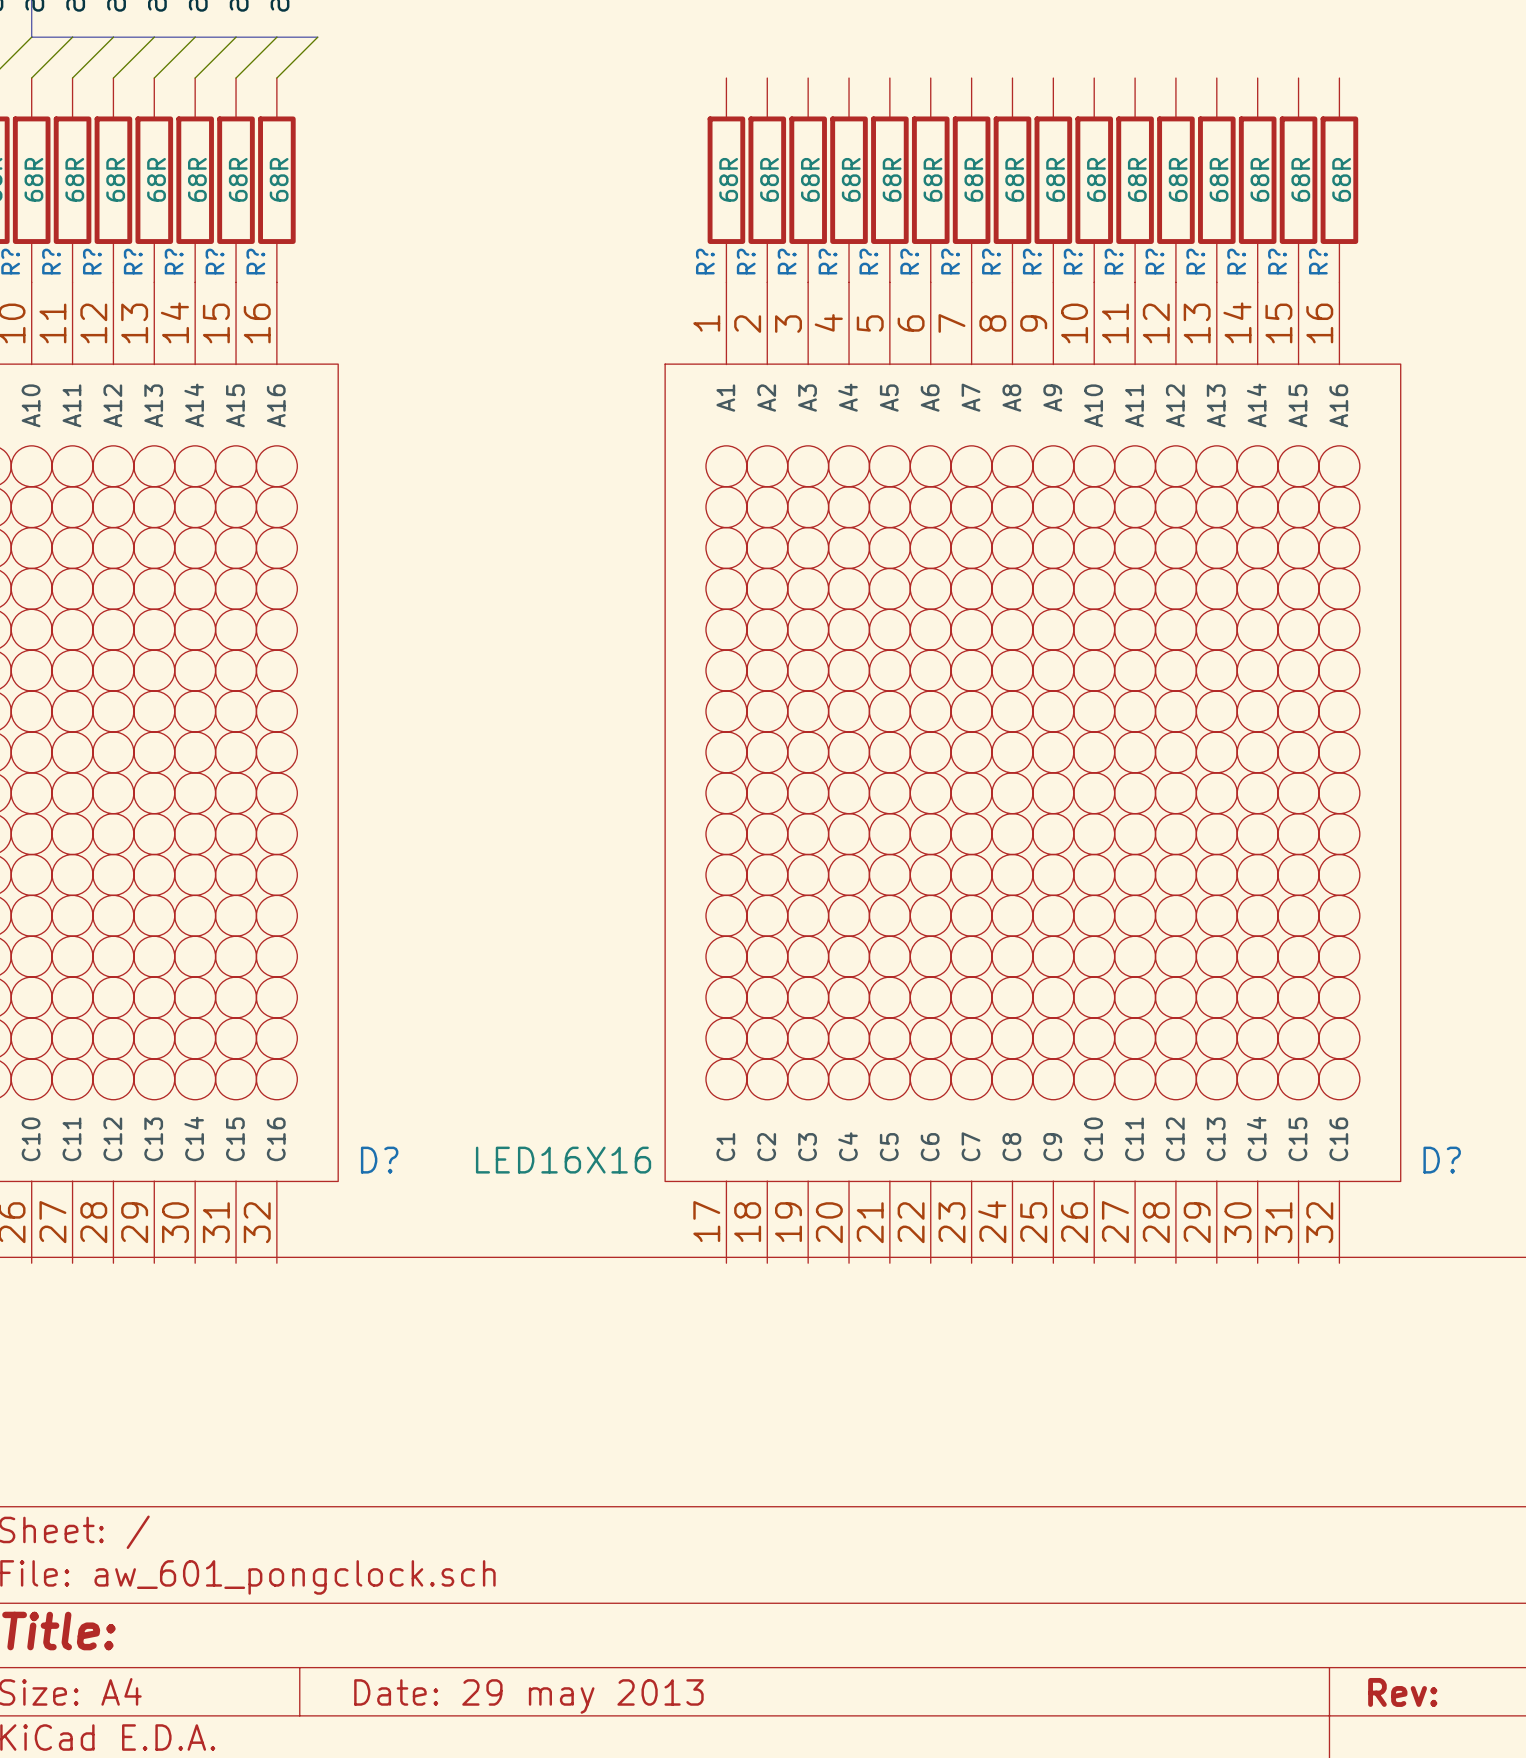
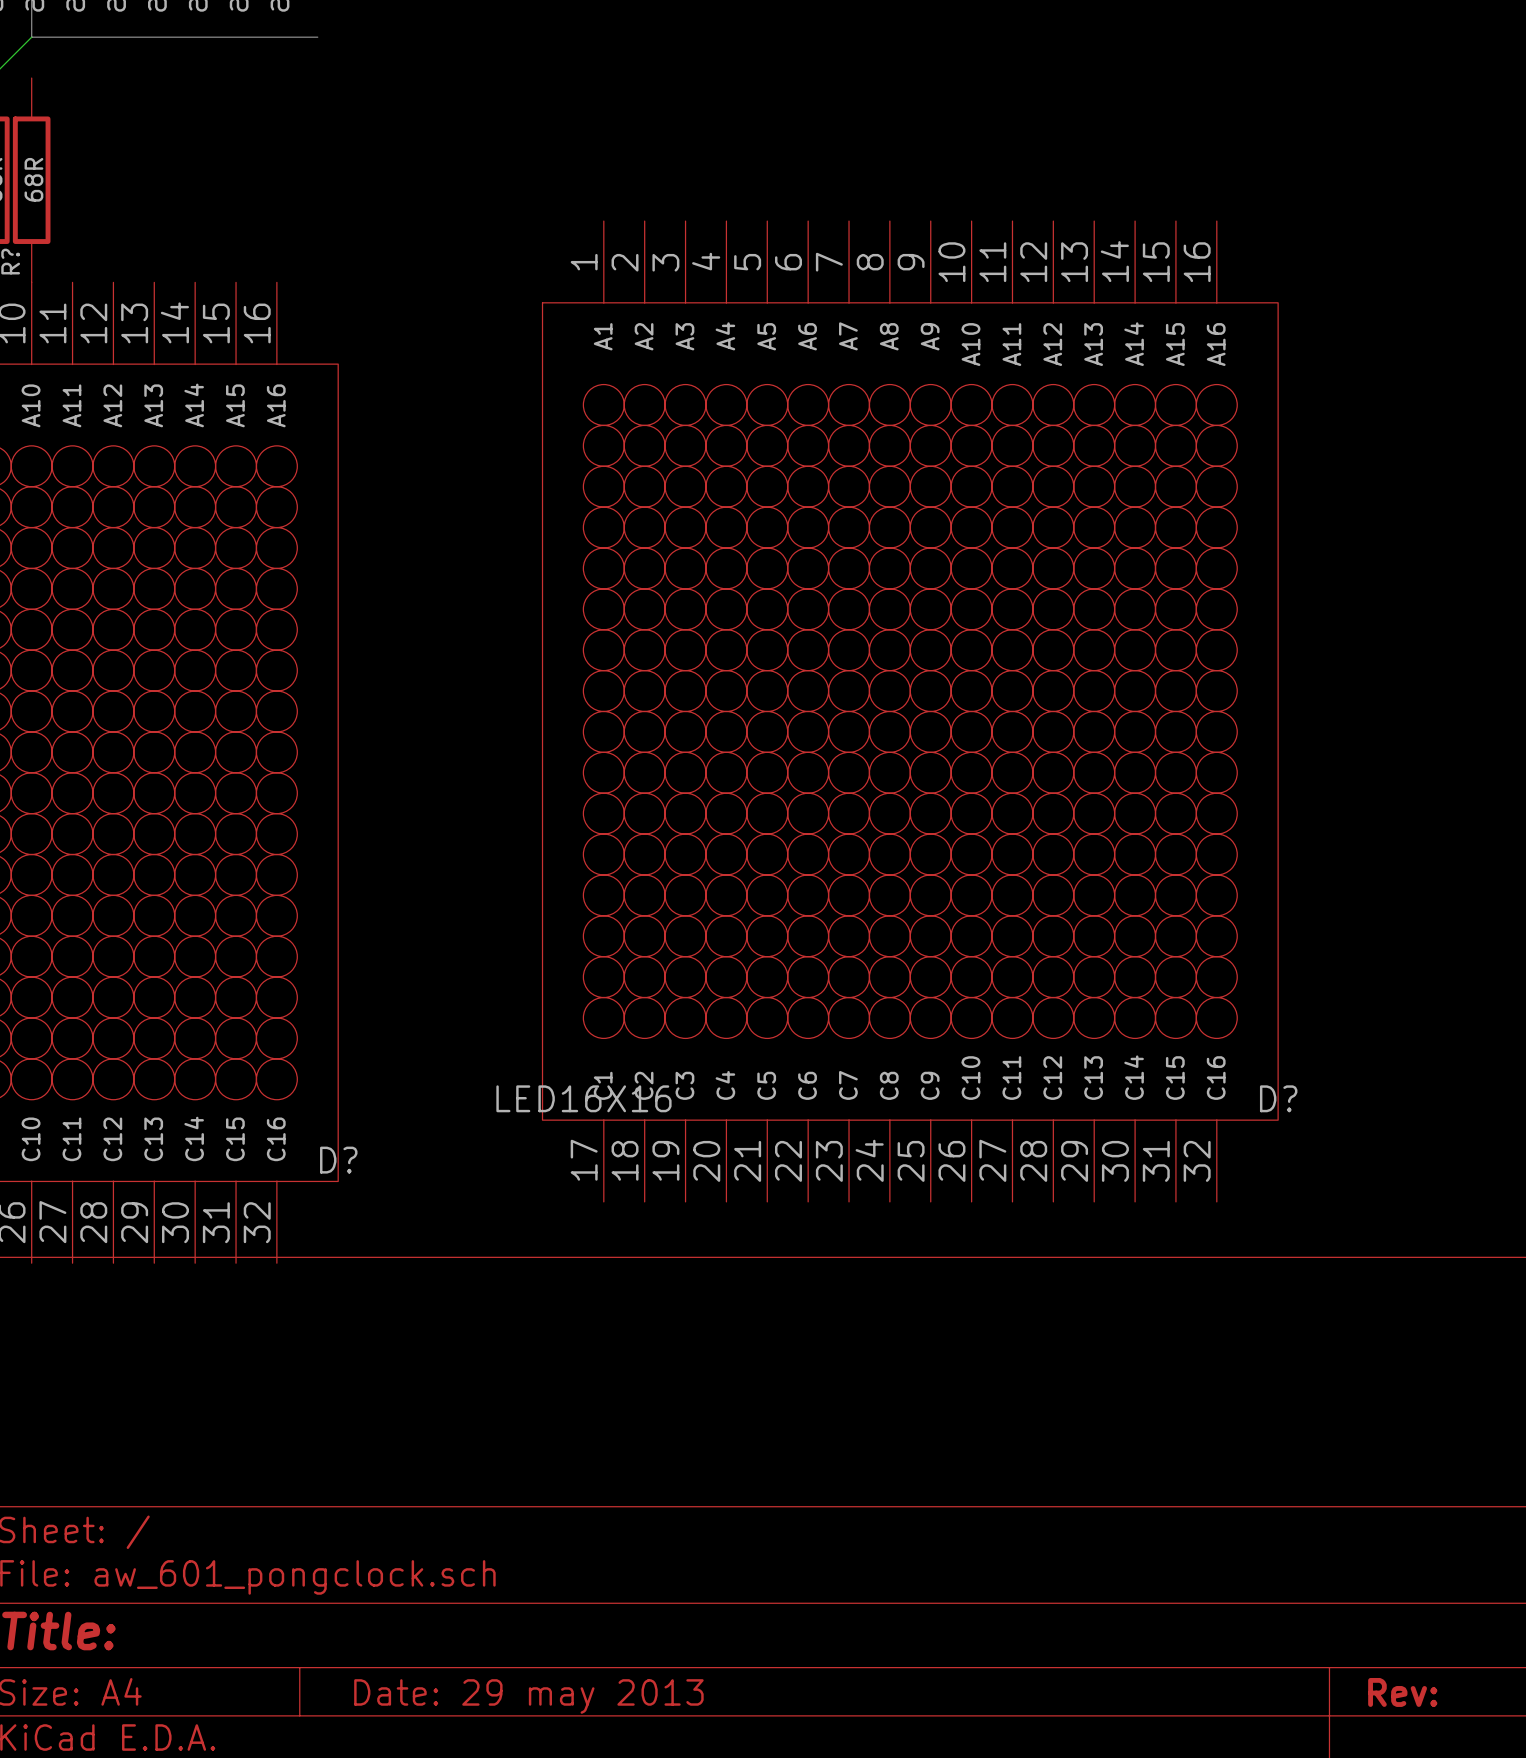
wire: (72, 37) (31, 78) -> none
wire: (113, 37) (72, 78) -> none
wire: (154, 37) (113, 78) -> none
wire: (195, 37) (154, 78) -> none
wire: (236, 37) (195, 78) -> none
wire: (276, 37) (236, 78) -> none
wire: (317, 37) (276, 78) -> none
R?: 68R (72, 180) -> none
R?: 68R (113, 180) -> none
R?: 68R (154, 180) -> none
R?: 68R (195, 180) -> none
R?: 68R (236, 180) -> none
R?: 68R (276, 180) -> none
R?: 68R (726, 180) -> none
R?: 68R (767, 180) -> none
R?: 68R (808, 180) -> none
R?: 68R (849, 180) -> none
R?: 68R (889, 180) -> none
R?: 68R (930, 180) -> none
R?: 68R (971, 180) -> none
R?: 68R (1012, 180) -> none
R?: 68R (1053, 180) -> none
R?: 68R (1094, 180) -> none
R?: 68R (1135, 180) -> none
R?: 68R (1175, 180) -> none
R?: 68R (1216, 180) -> none
R?: 68R (1257, 180) -> none
R?: 68R (1298, 180) -> none
R?: 68R (1339, 180) -> none
D? position: (1032, 772) -> (910, 711)
D? name position: D? (379, 1160) -> D? (338, 1160)
D? value position: LED16X16 (563, 1160) -> LED16X16 (583, 1098)
D? name position: D? (1442, 1160) -> D? (1278, 1098)

